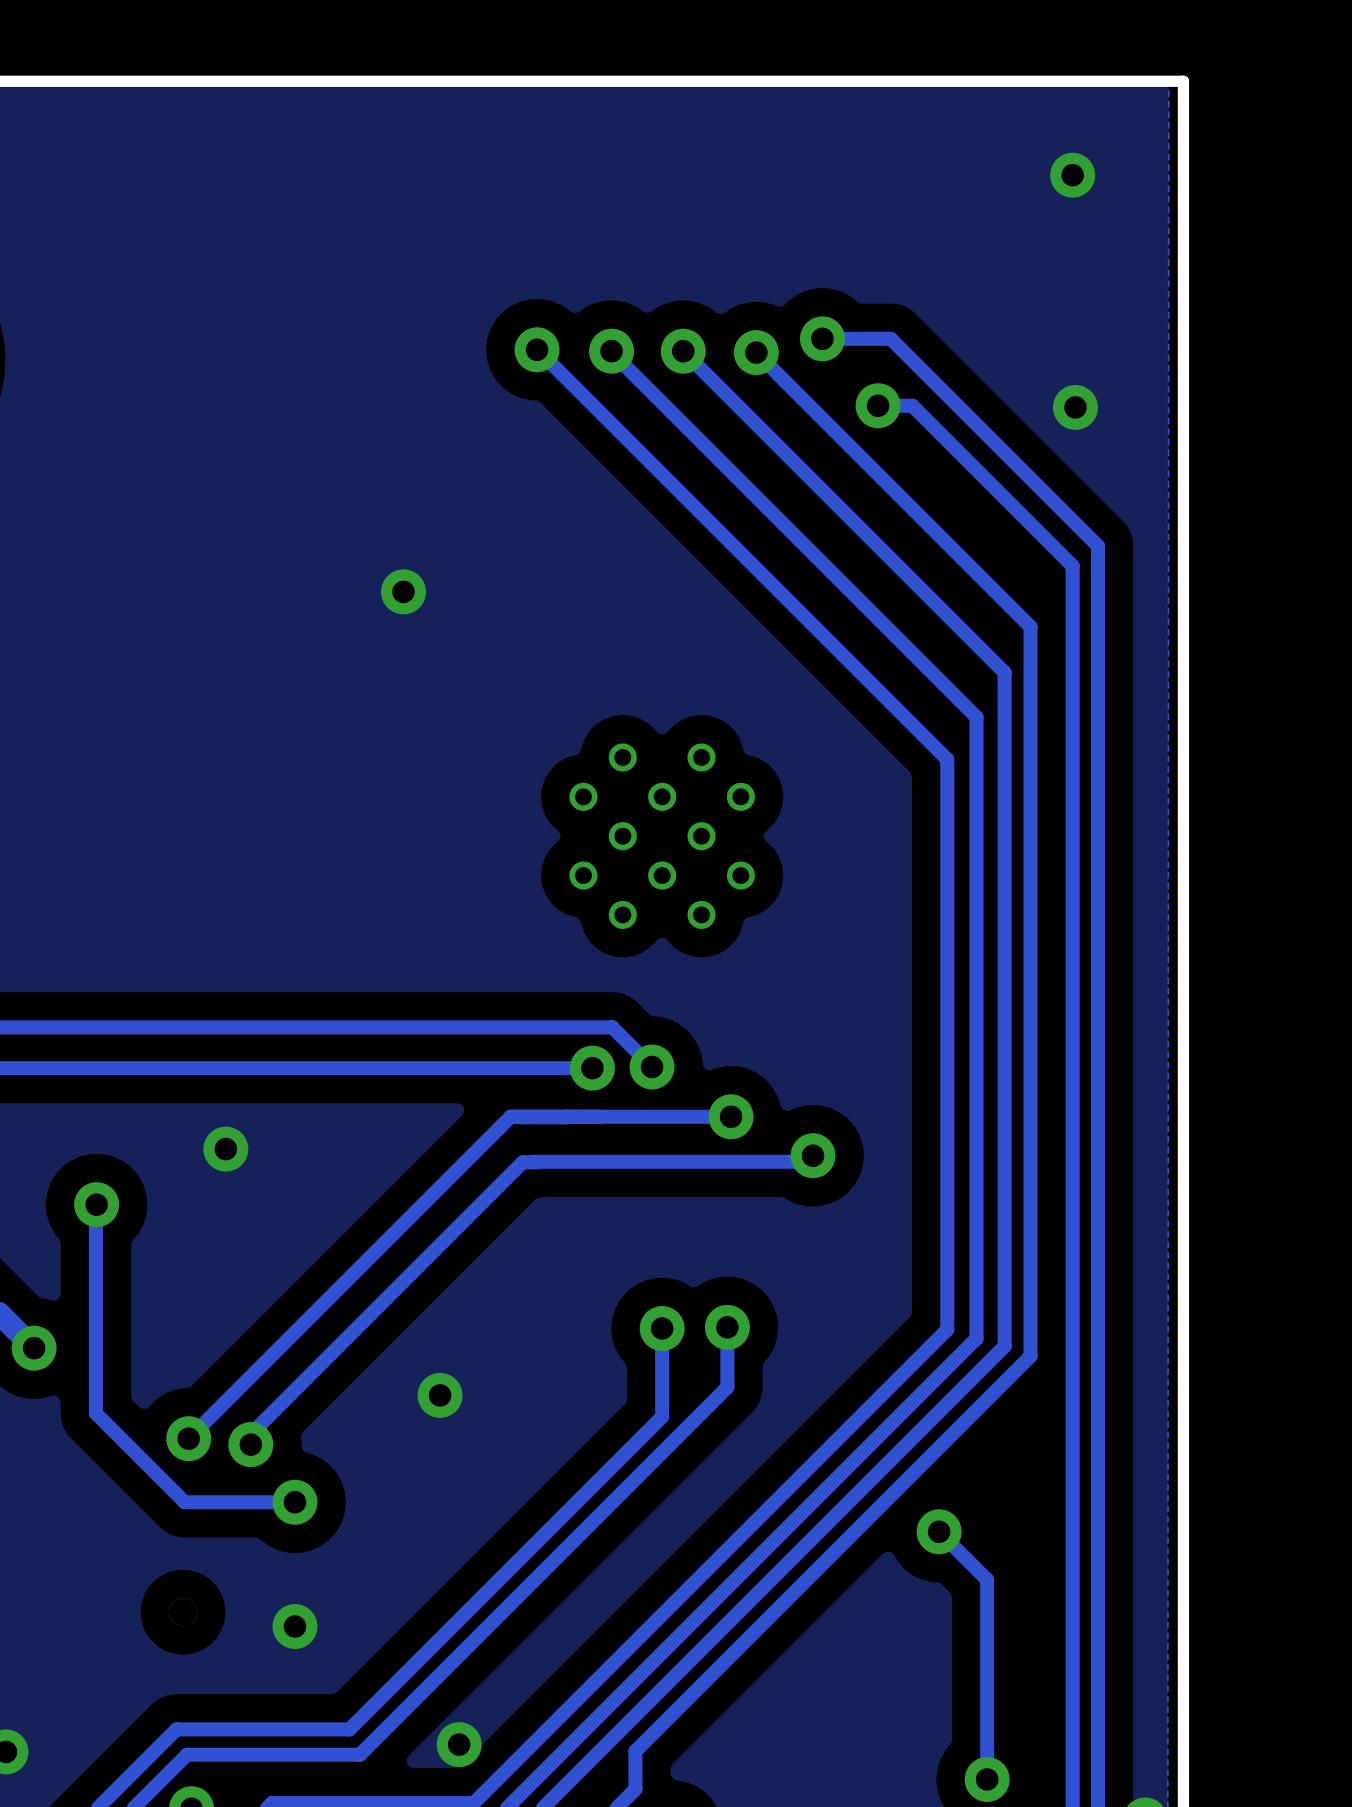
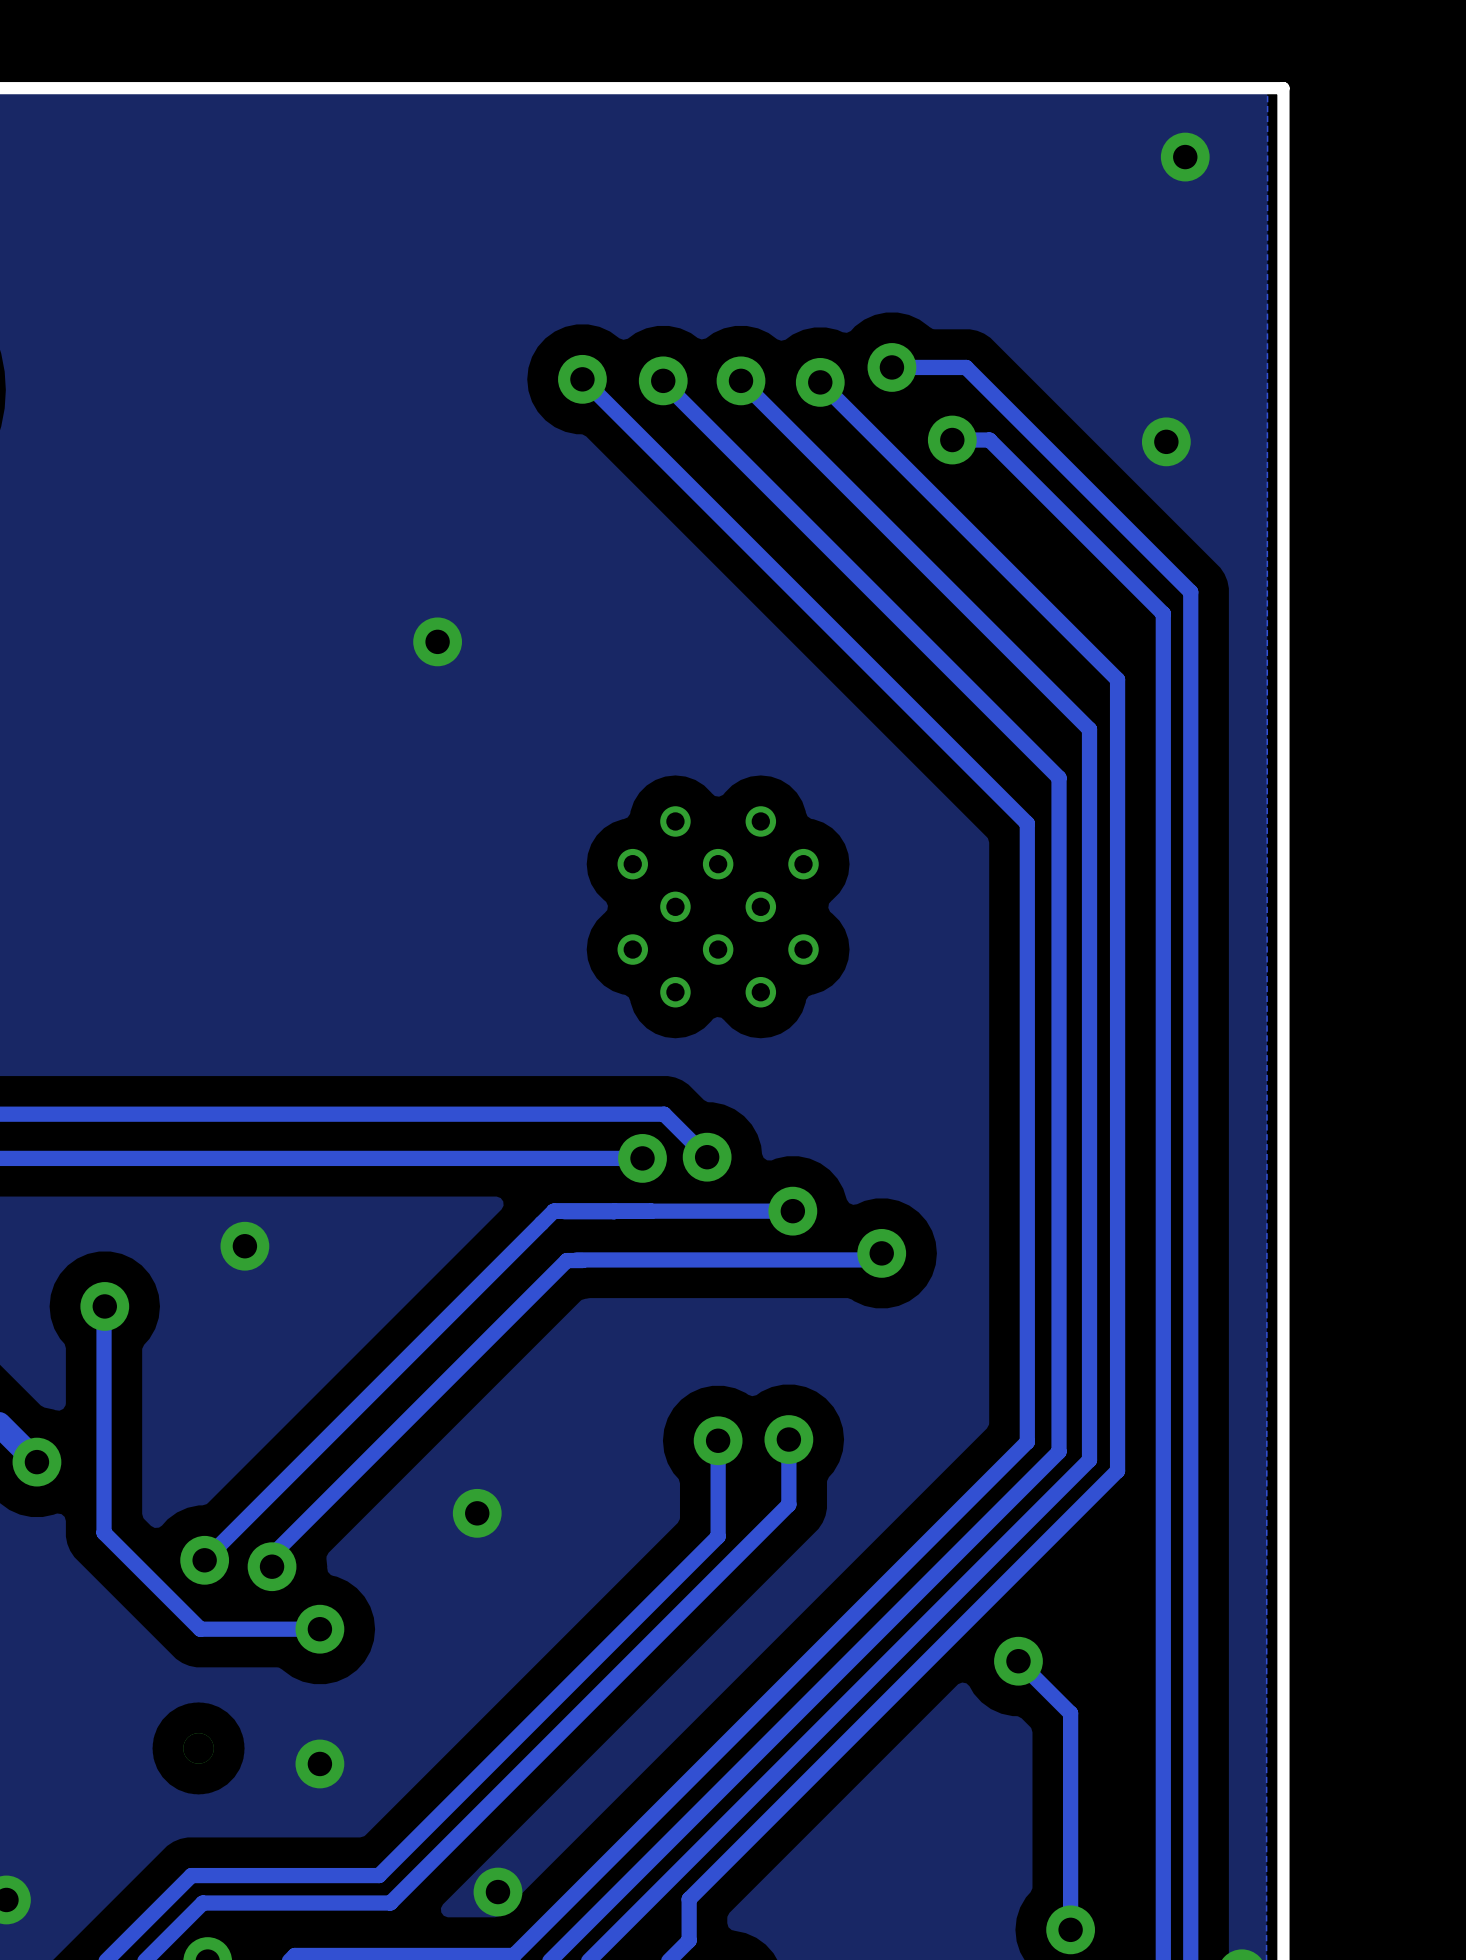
via position: (1072, 175) -> (1185, 157)

